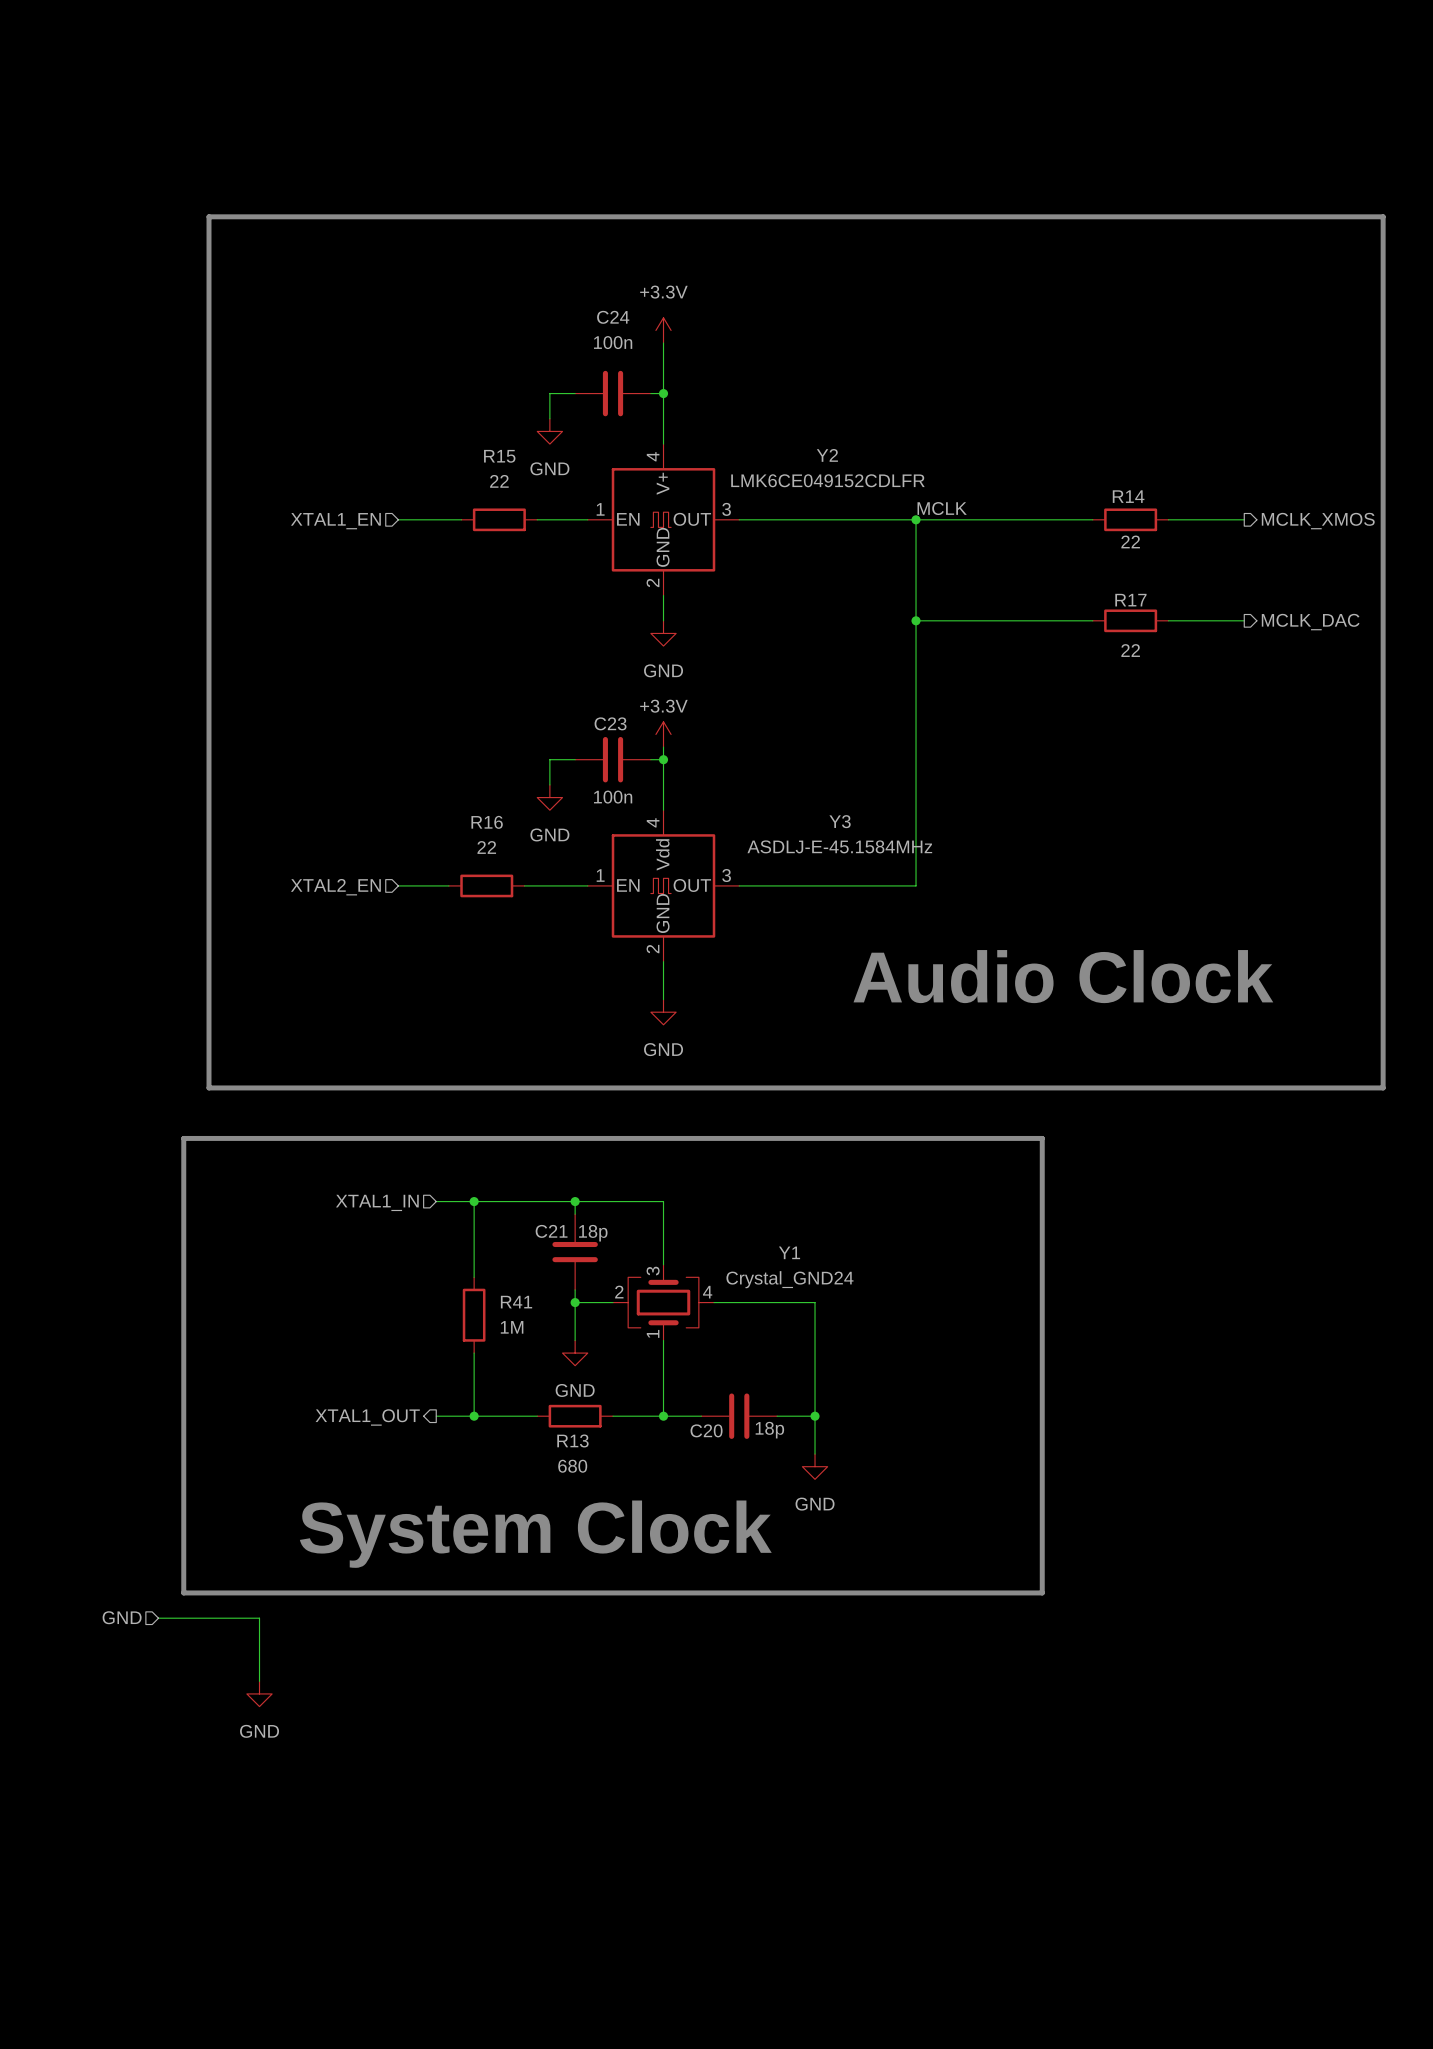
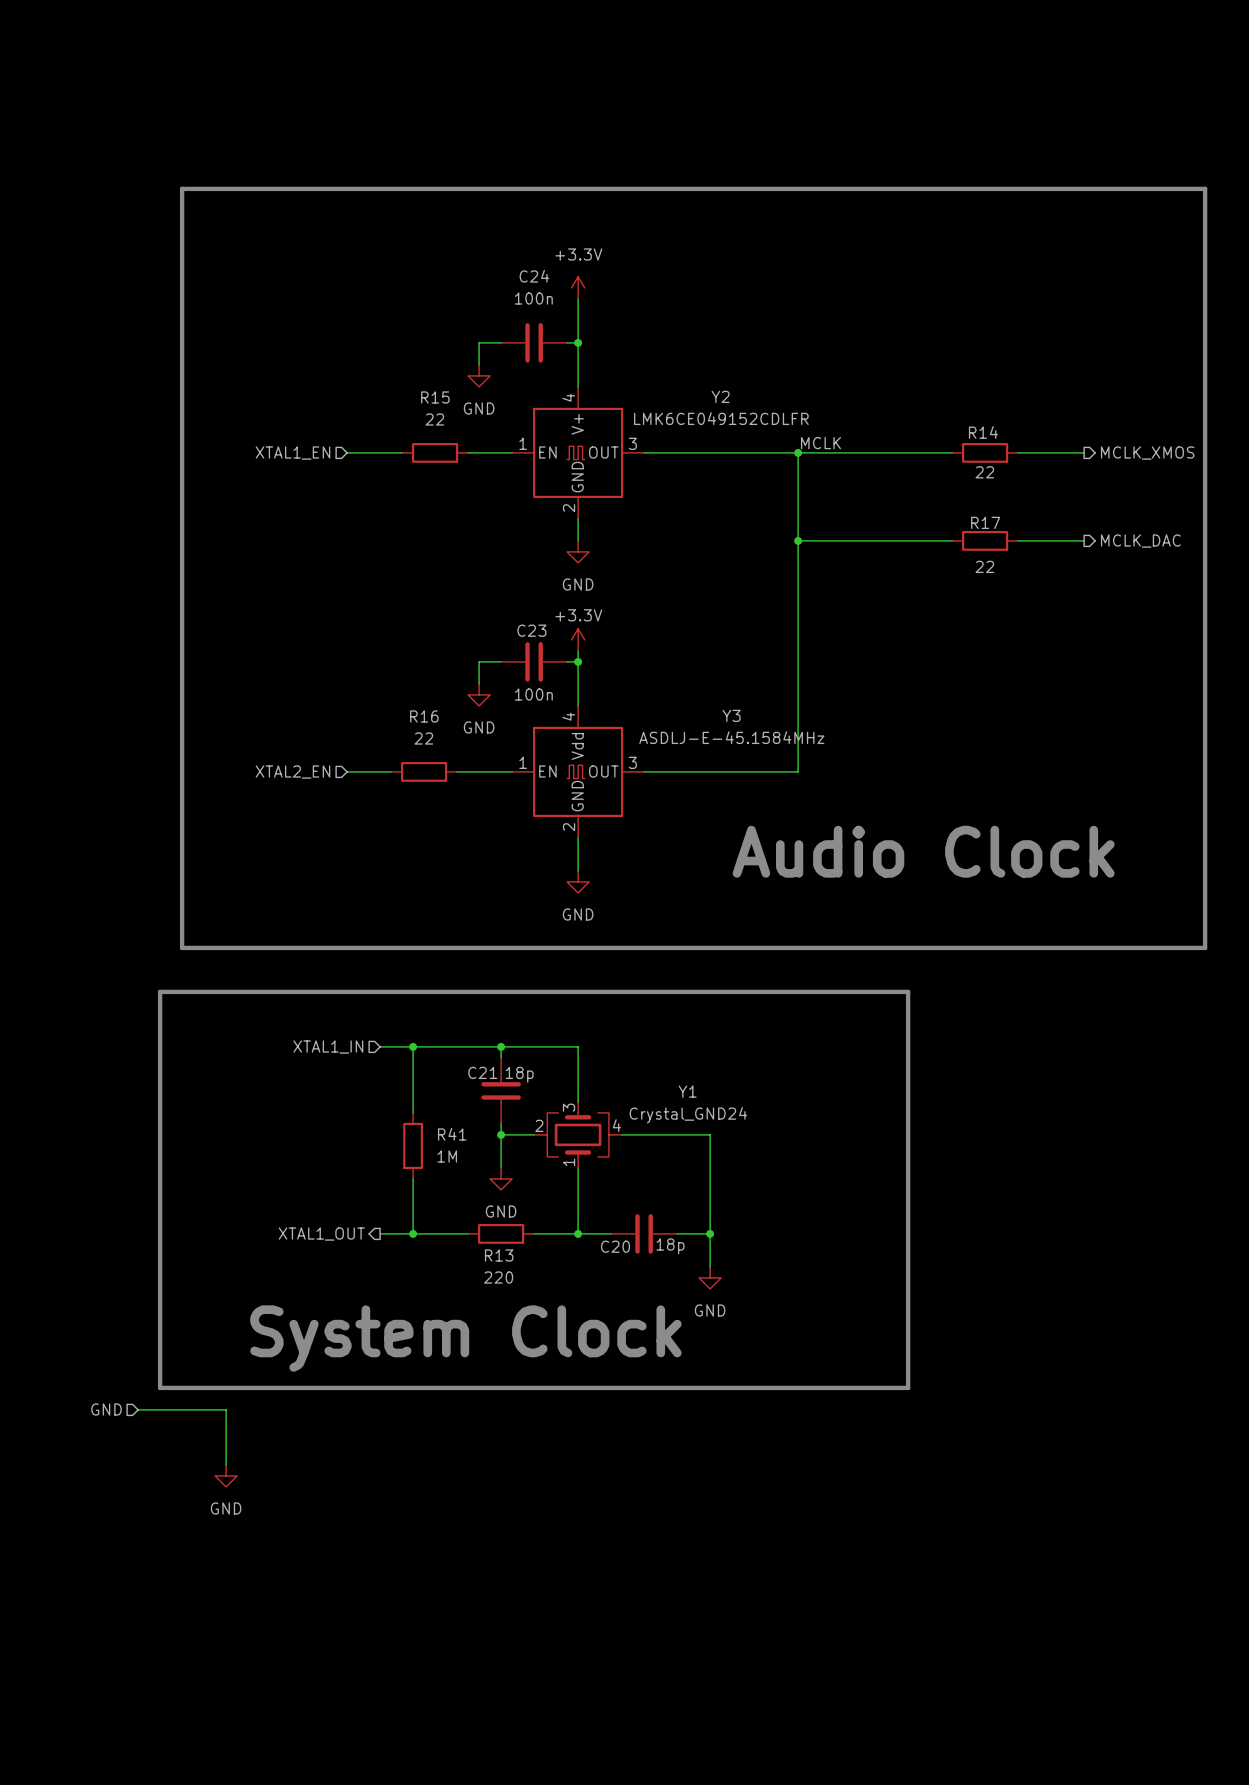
R13 value: 680 (572, 1466) -> 220 (498, 1277)

